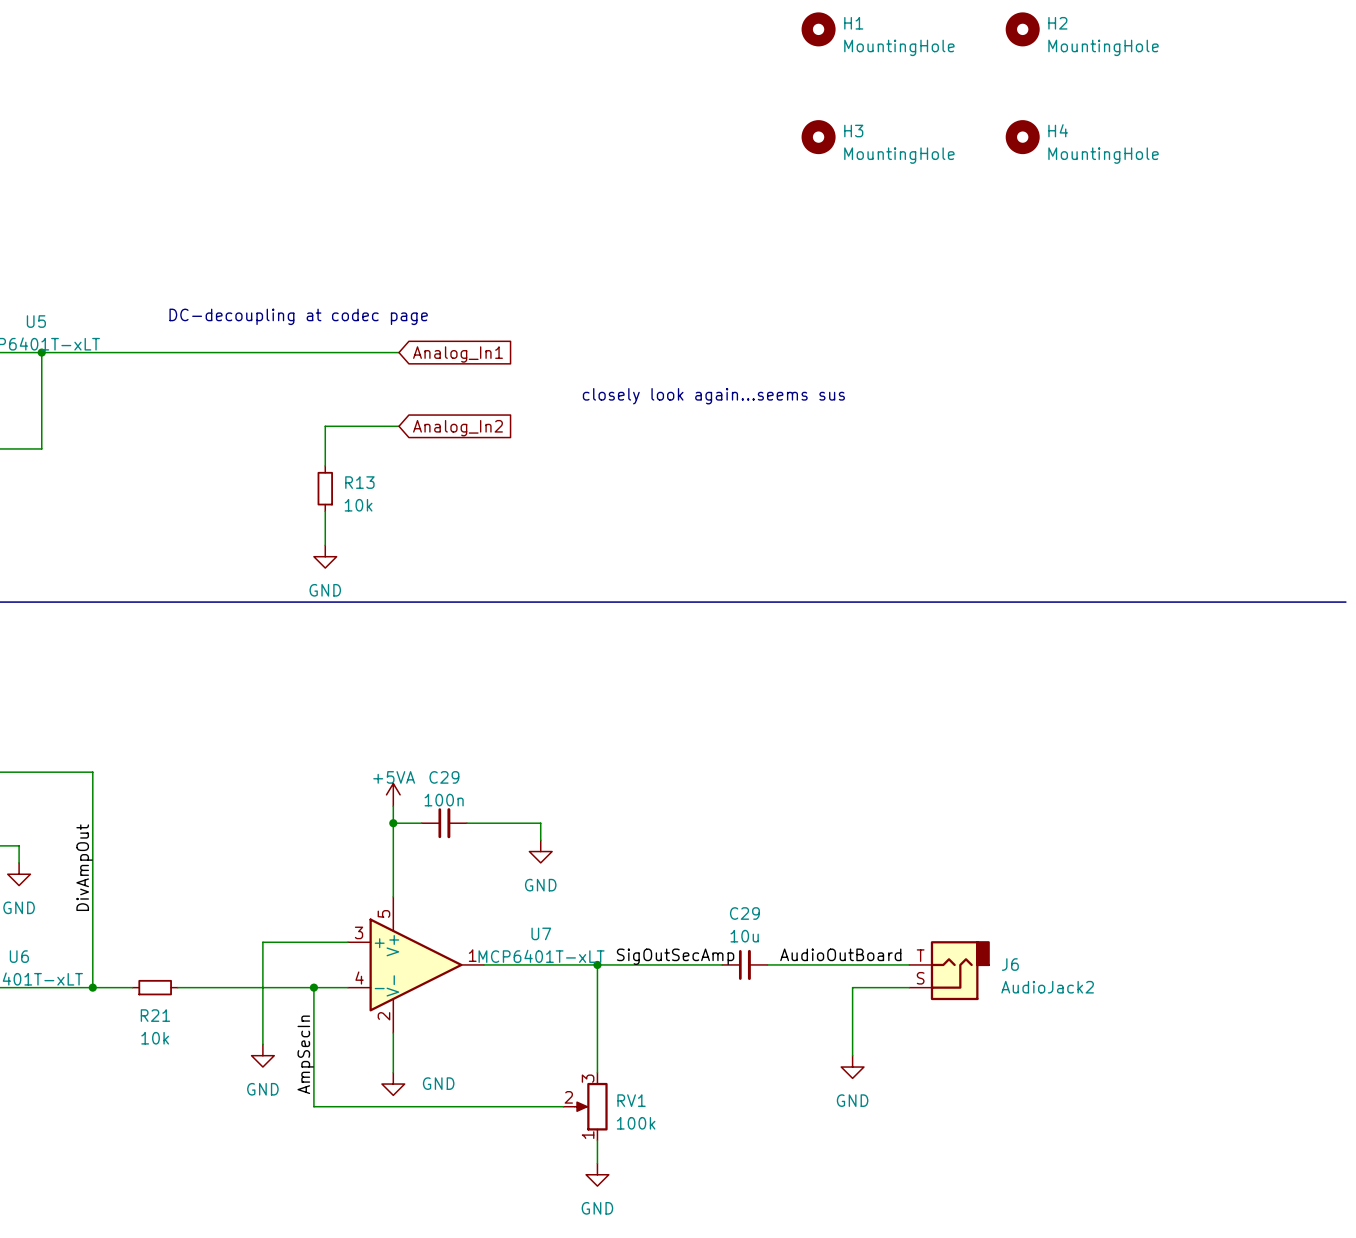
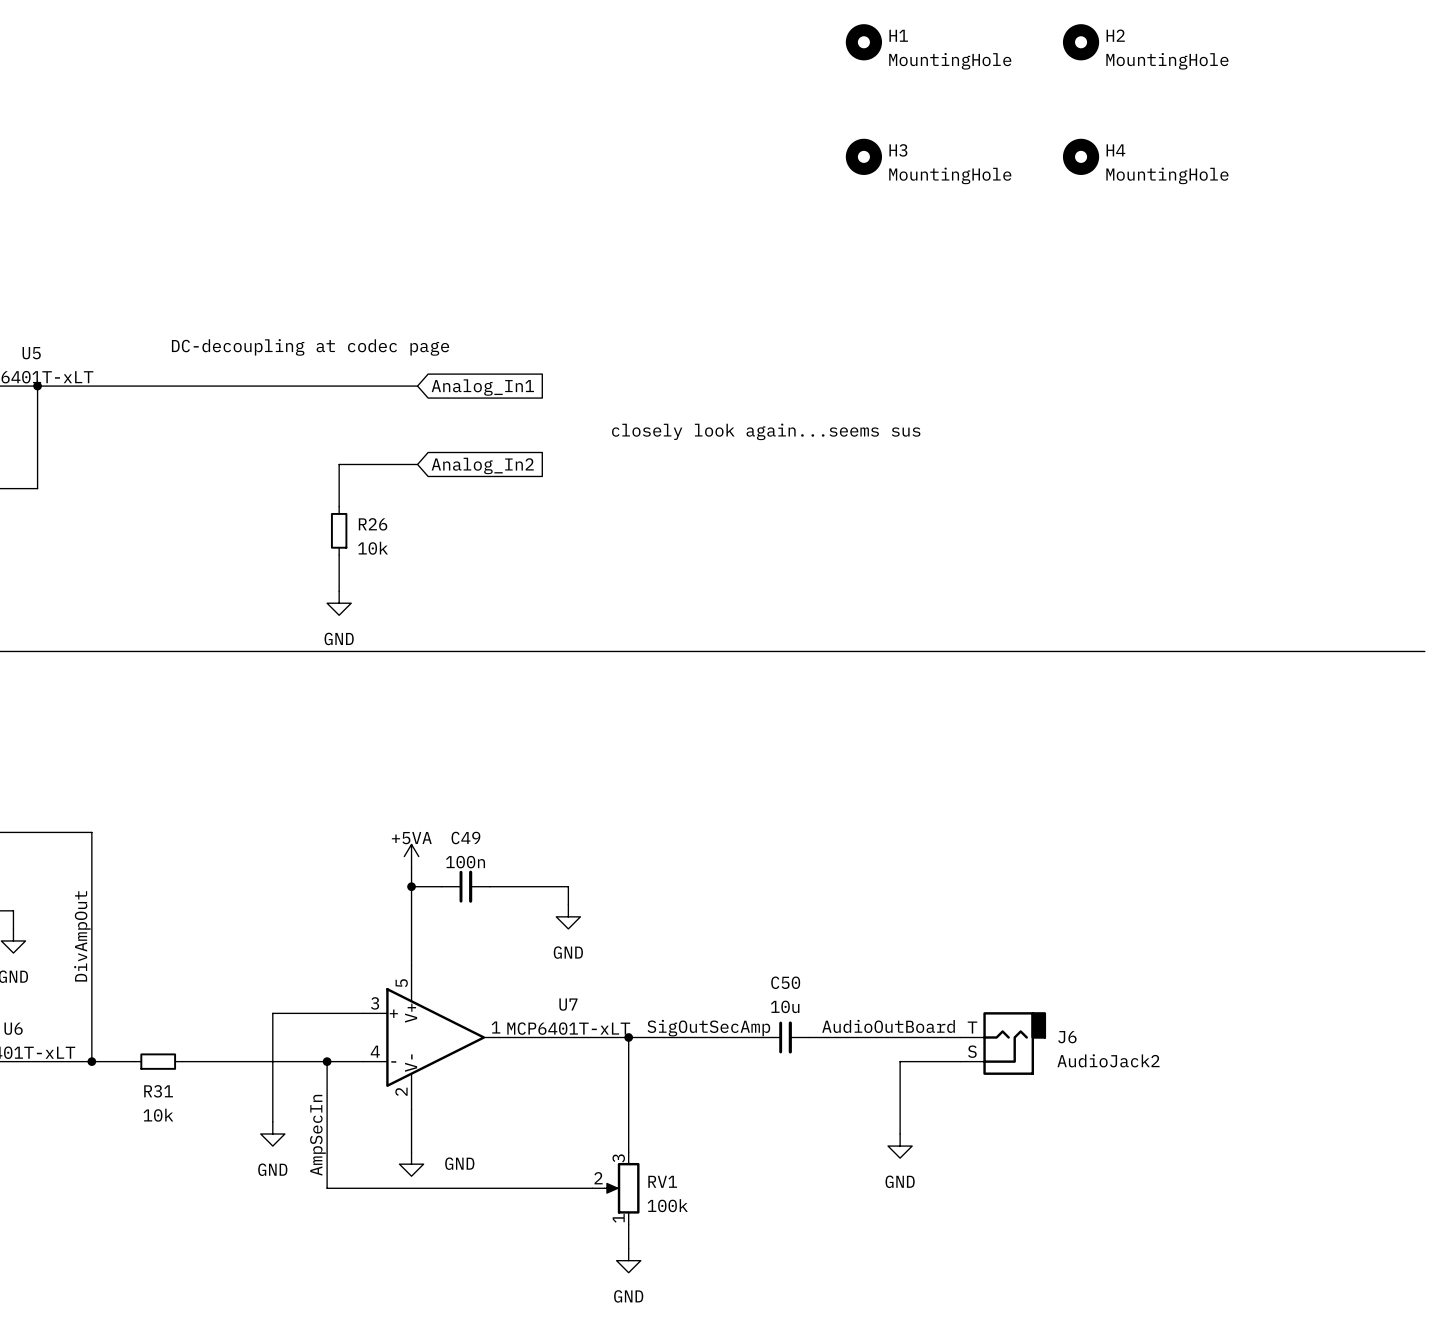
R13 name: R13 (359, 482) -> R26 (373, 524)
C29 name: C29 (444, 777) -> C49 (465, 838)
C29 name: C29 (744, 913) -> C50 (785, 982)
R21 name: R21 (155, 1015) -> R31 (158, 1091)

